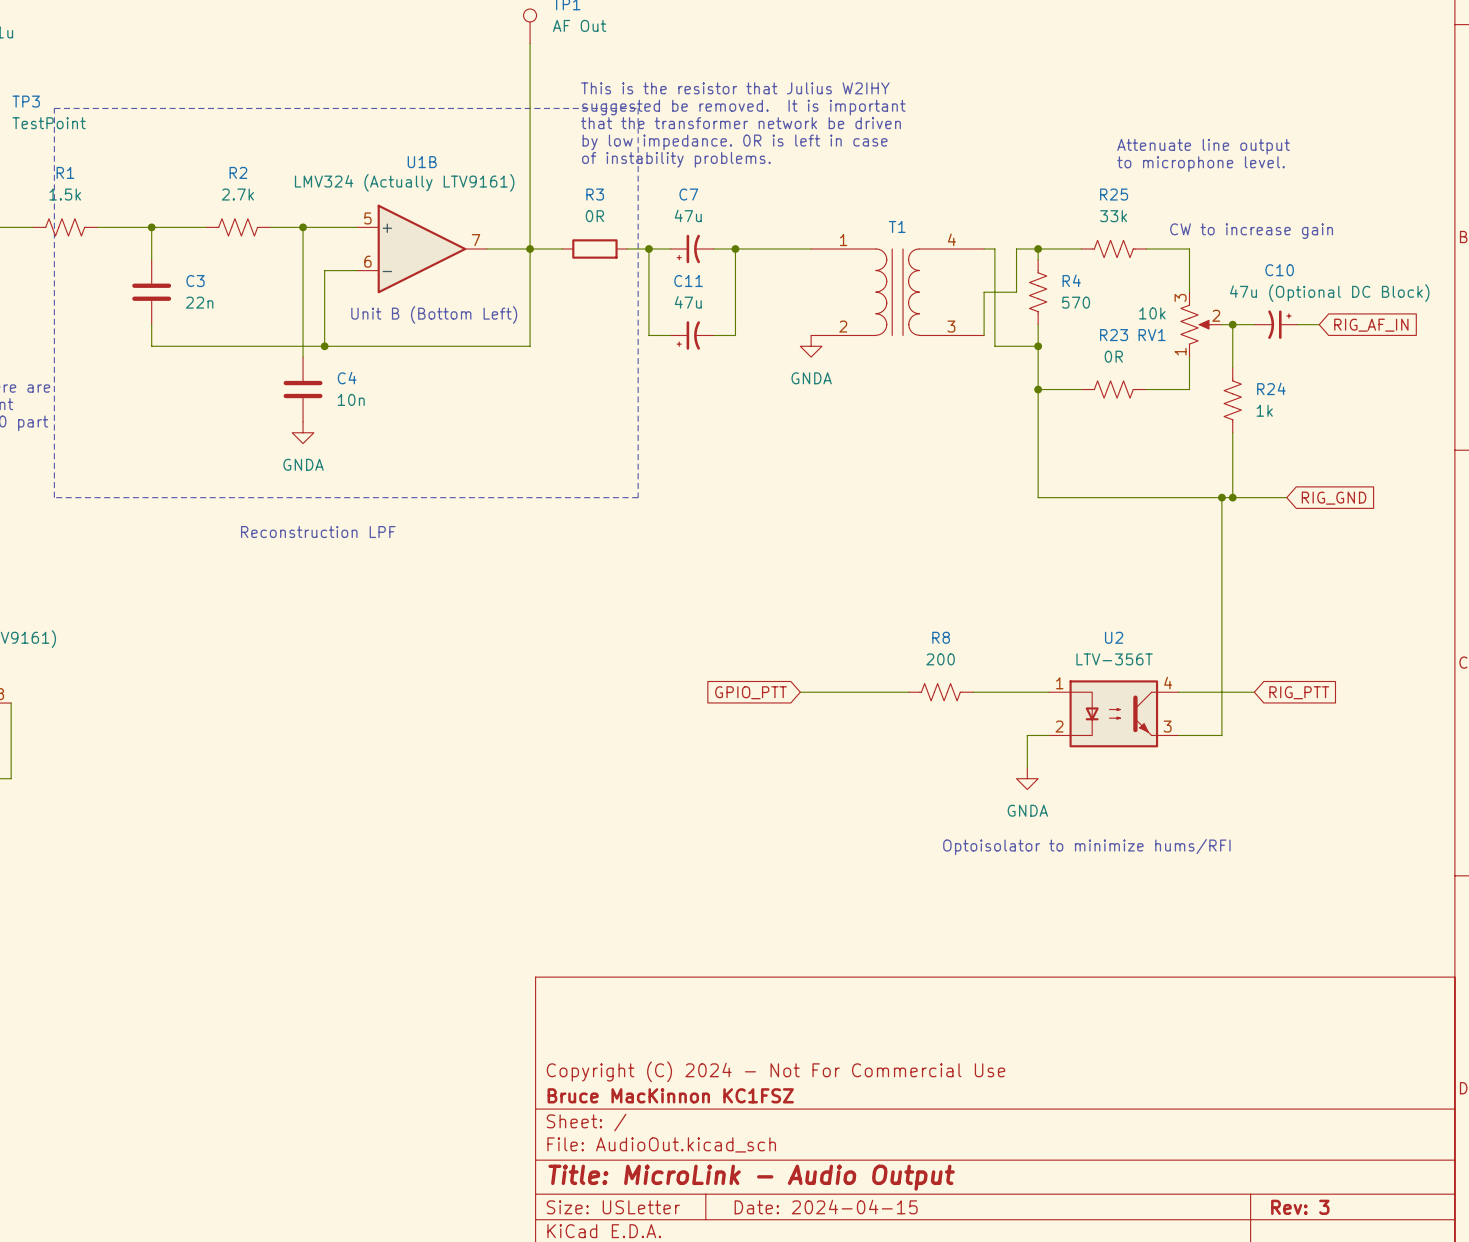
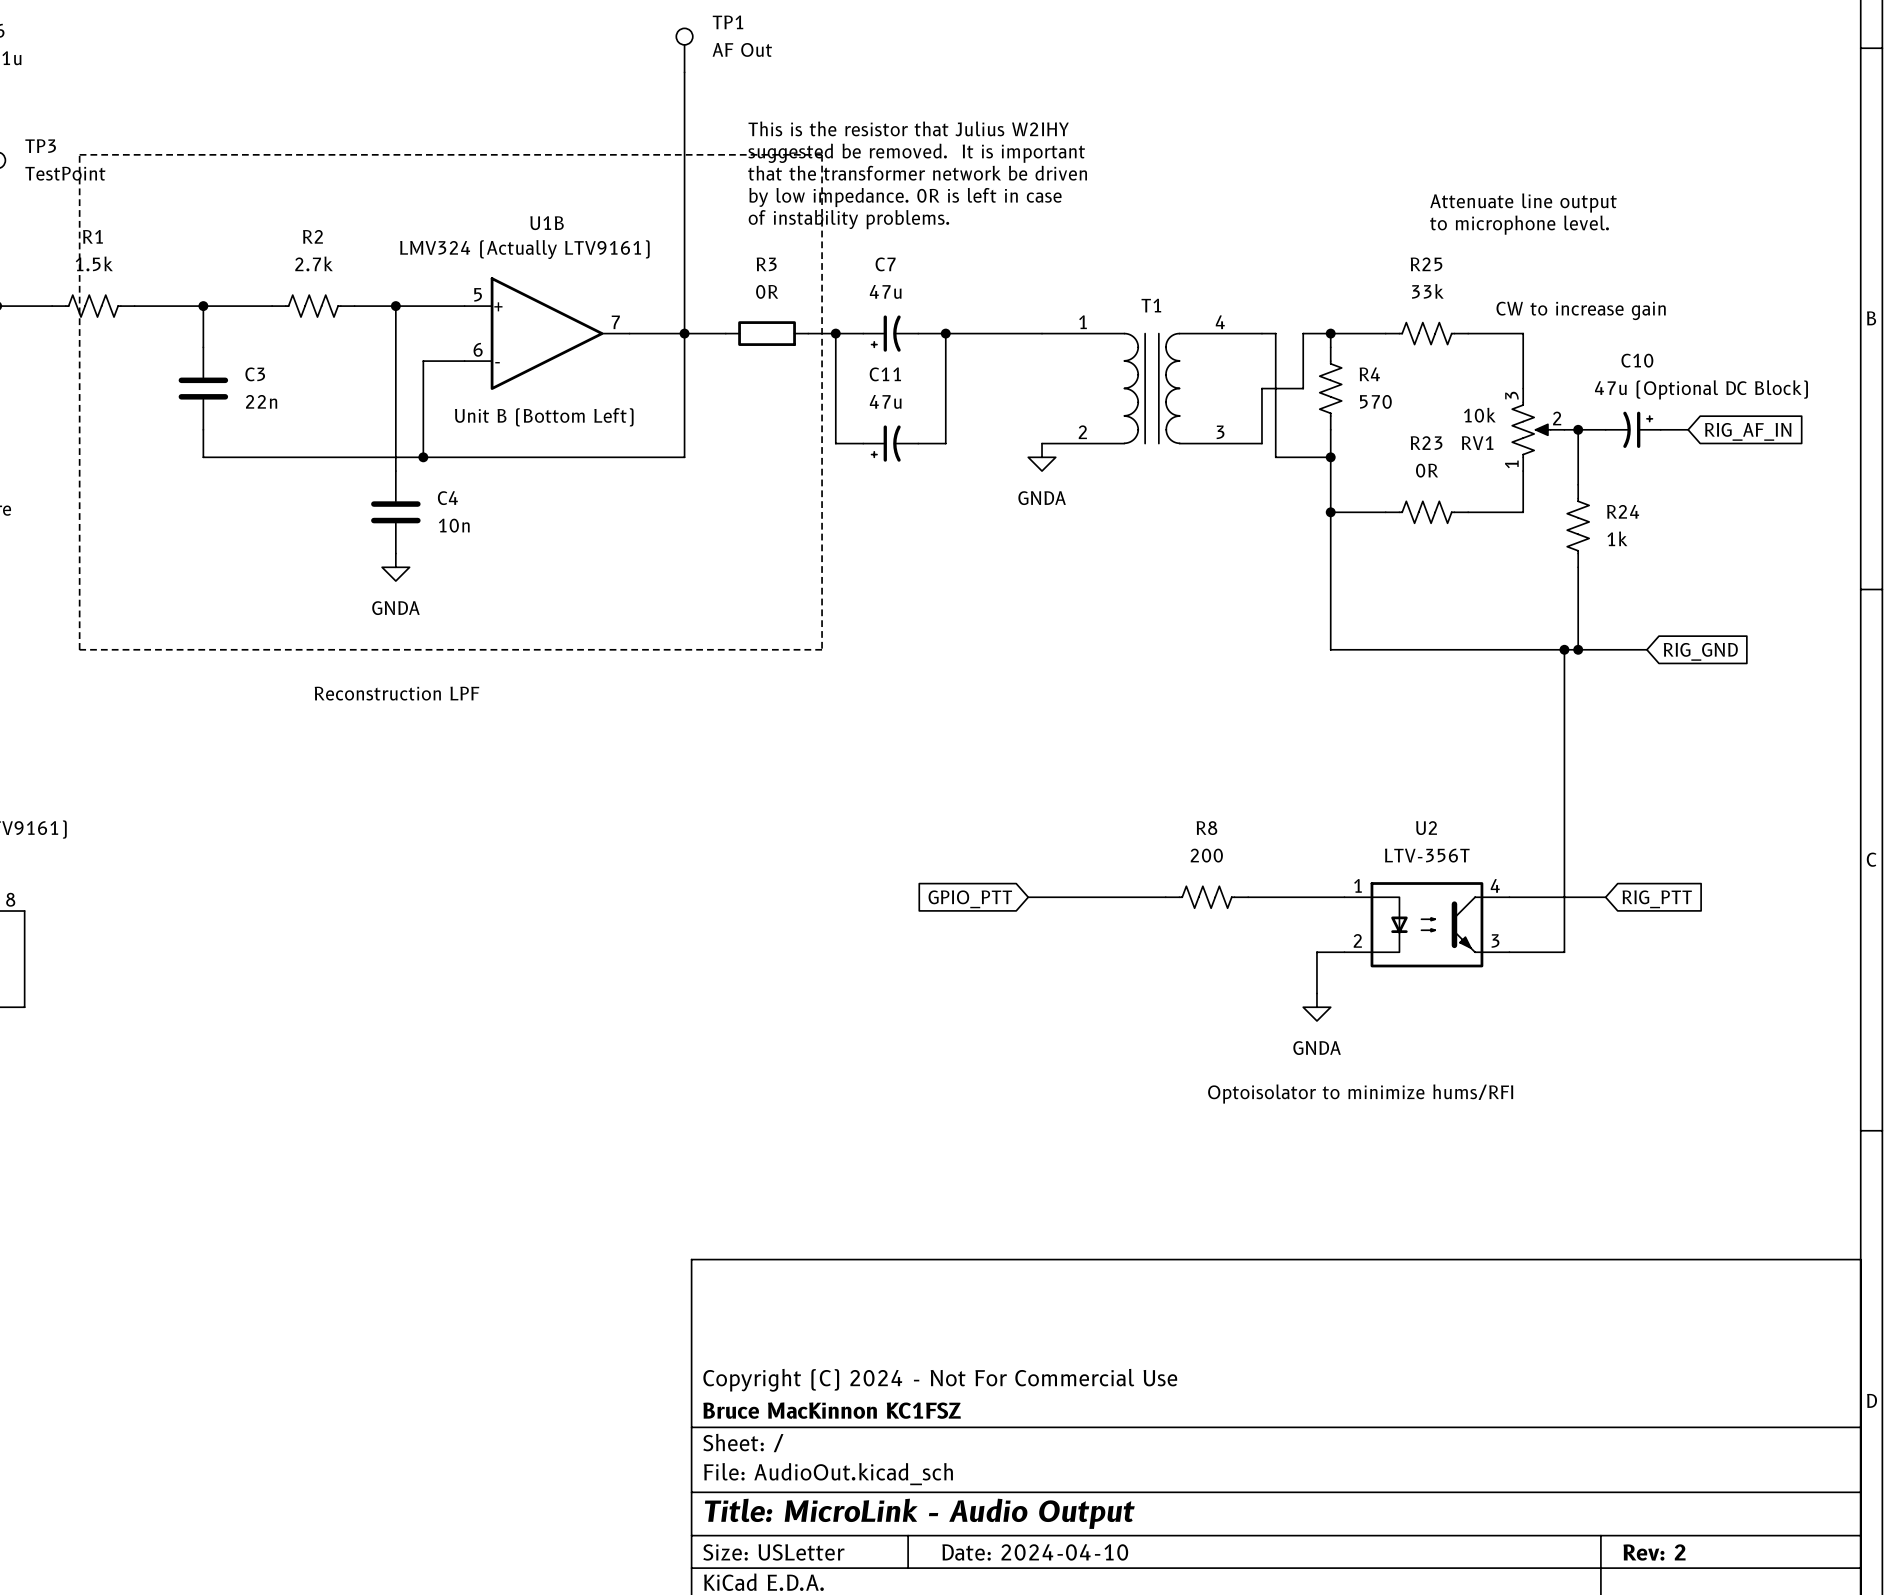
title block: Date: 2024-04-15 (826, 1207) -> Date: 2024-04-10 (1035, 1552)
title block: Rev: 3 (1300, 1207) -> Rev: 2 (1654, 1552)

